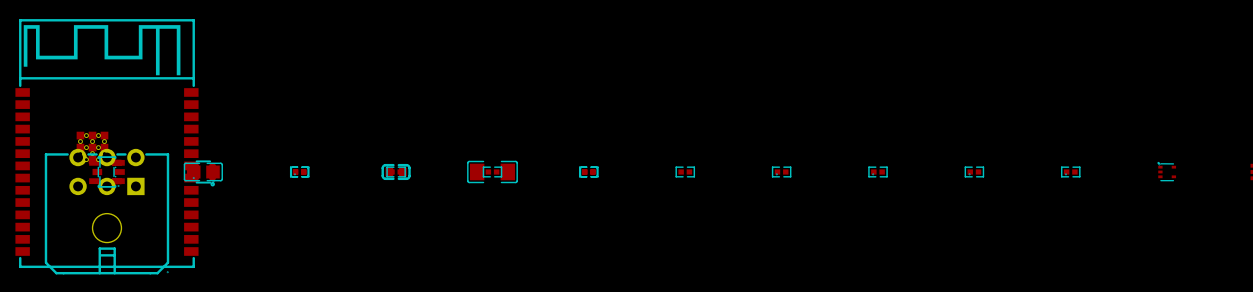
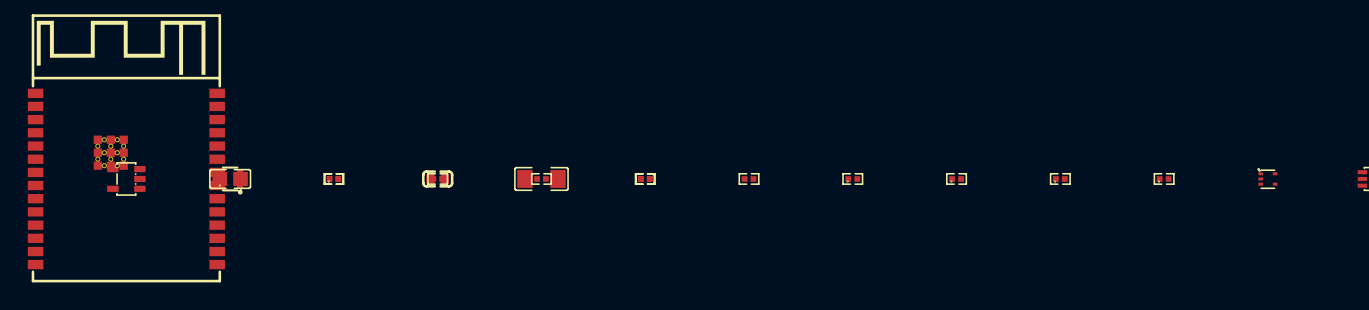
part: (106, 171) -> none
part: (106, 211) -> none

